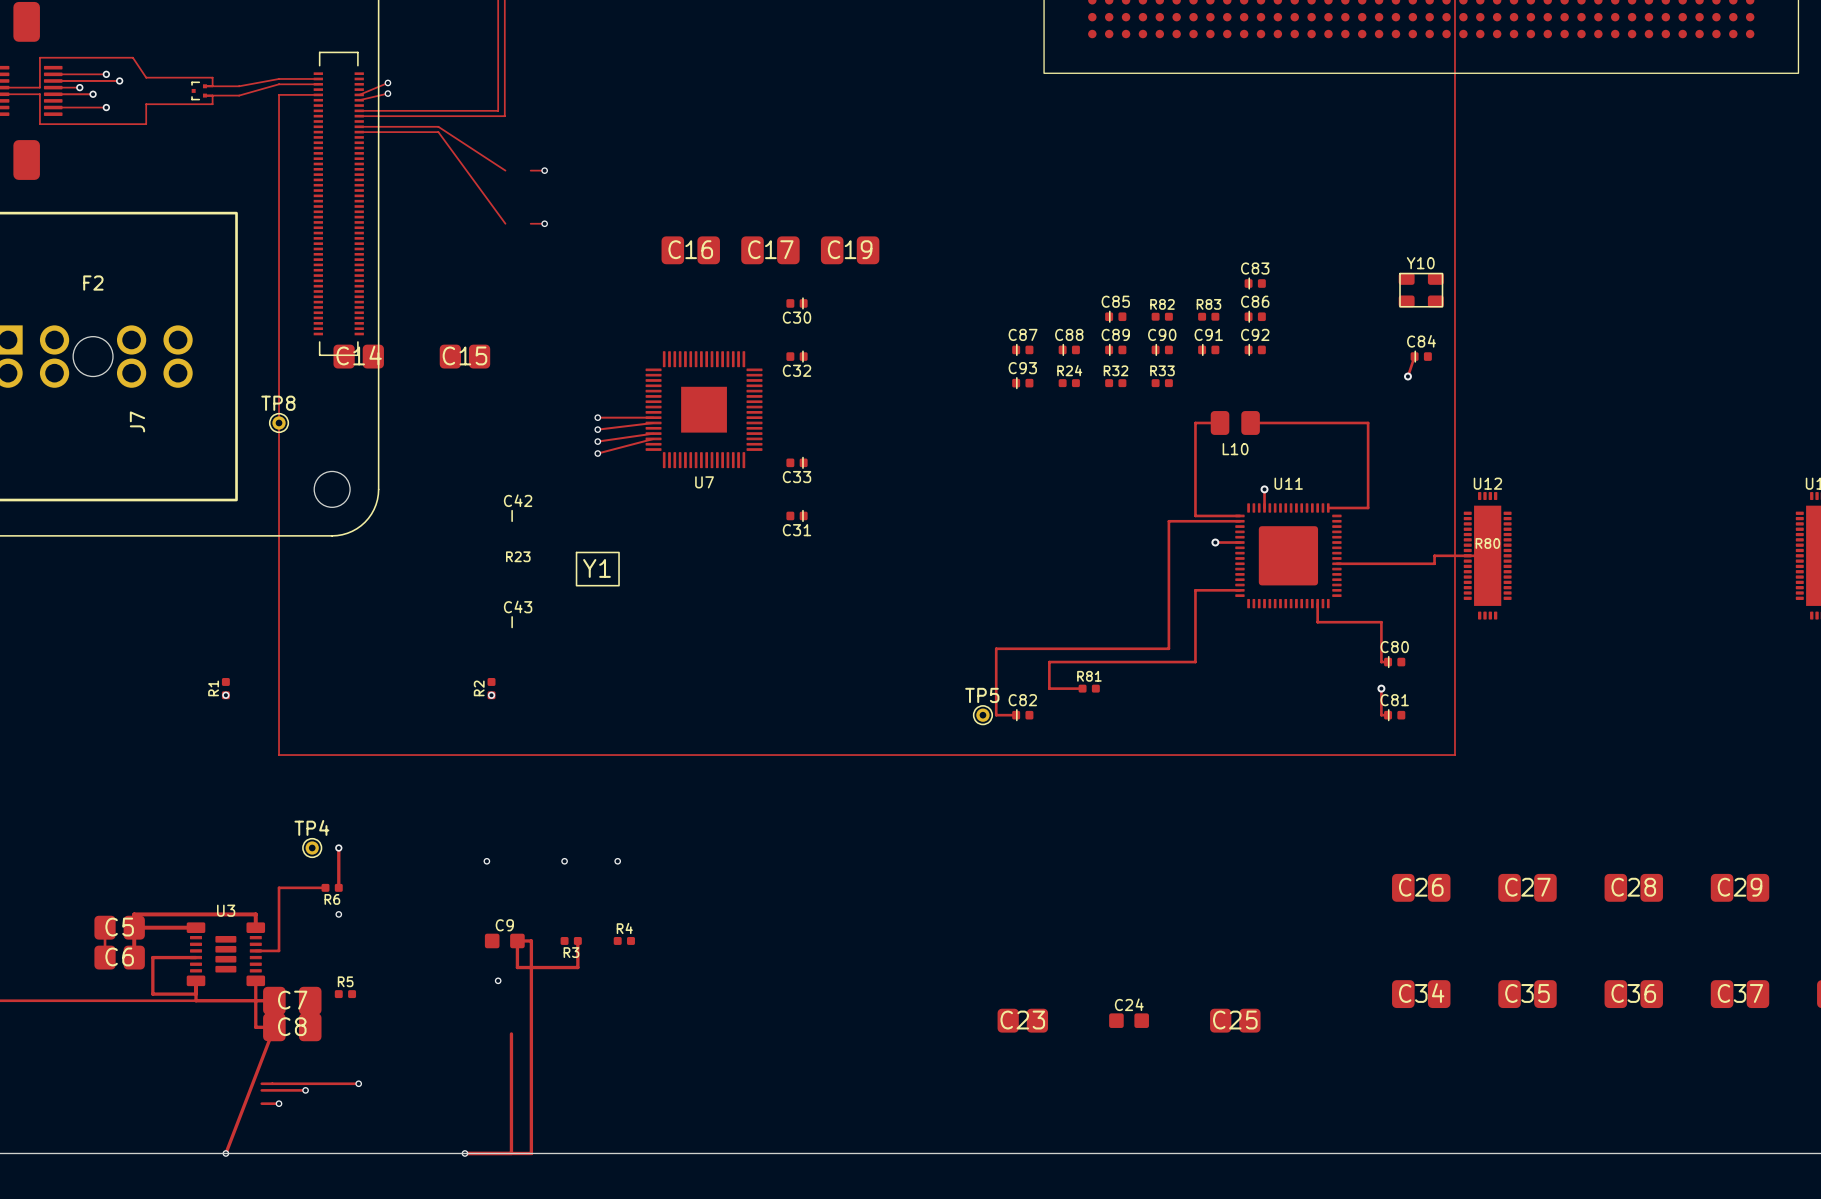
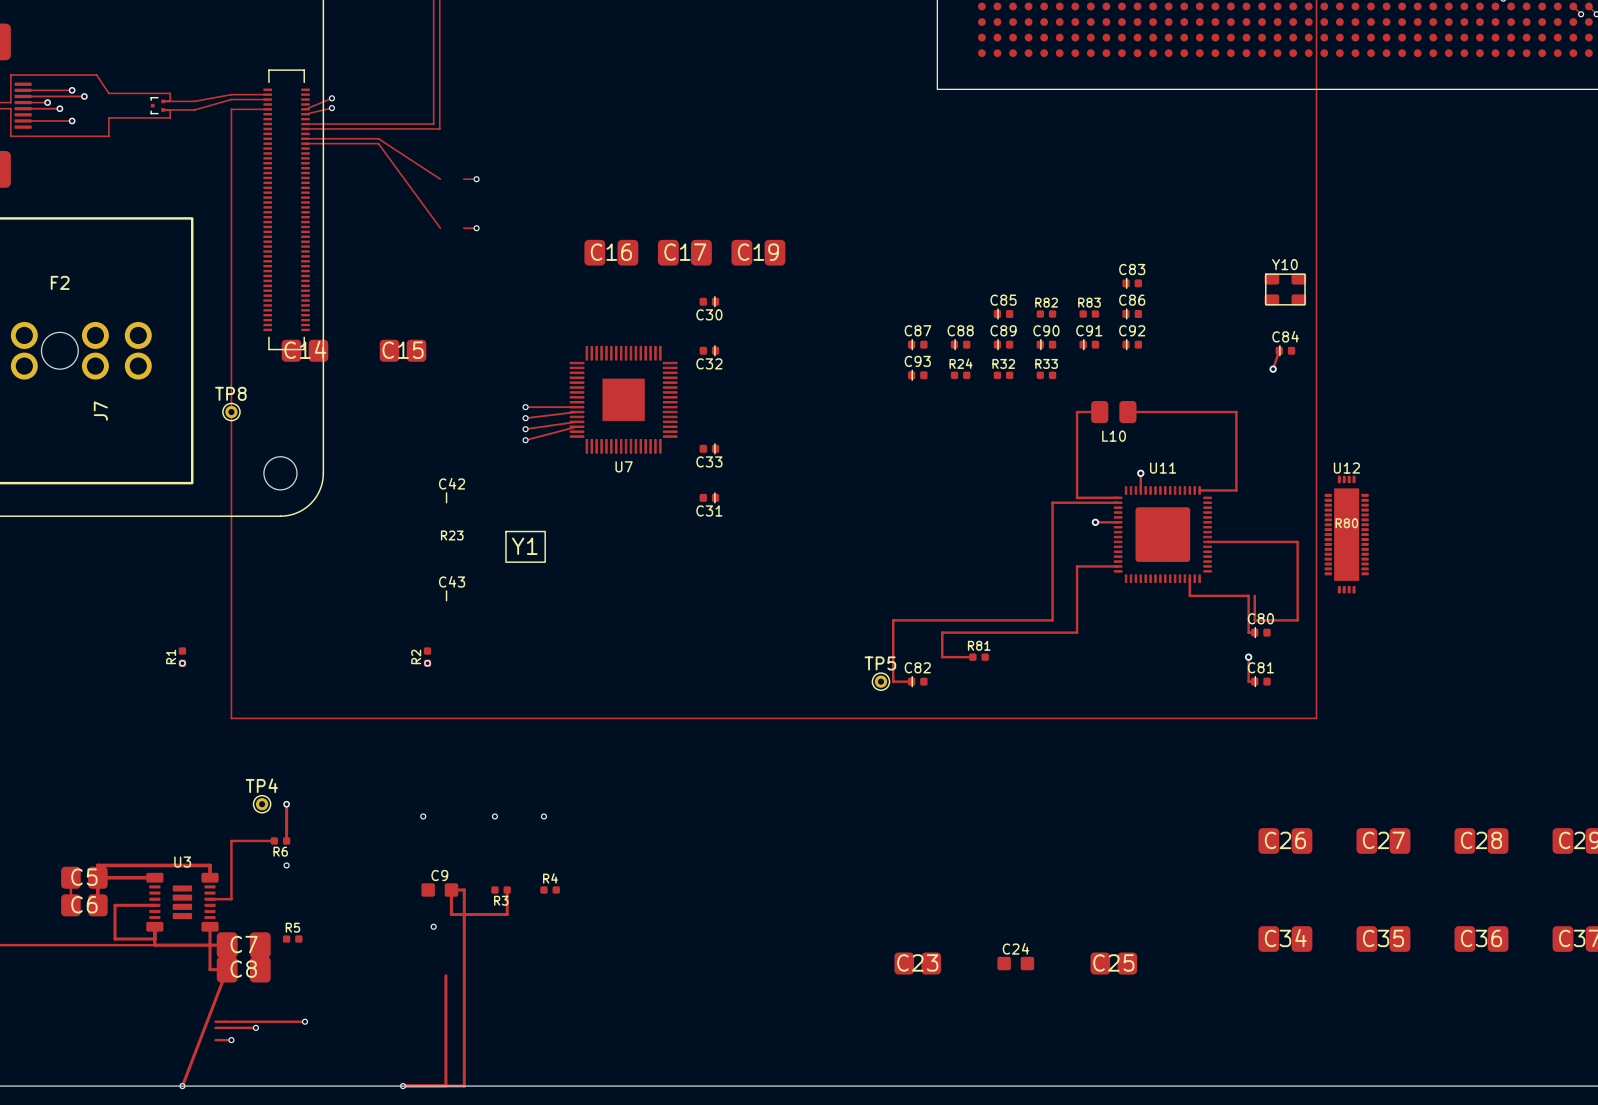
track: (1481, 555) (1434, 555) (1434, 563) -> (1254, 595) (1254, 620) (1297, 620) (1297, 541)

